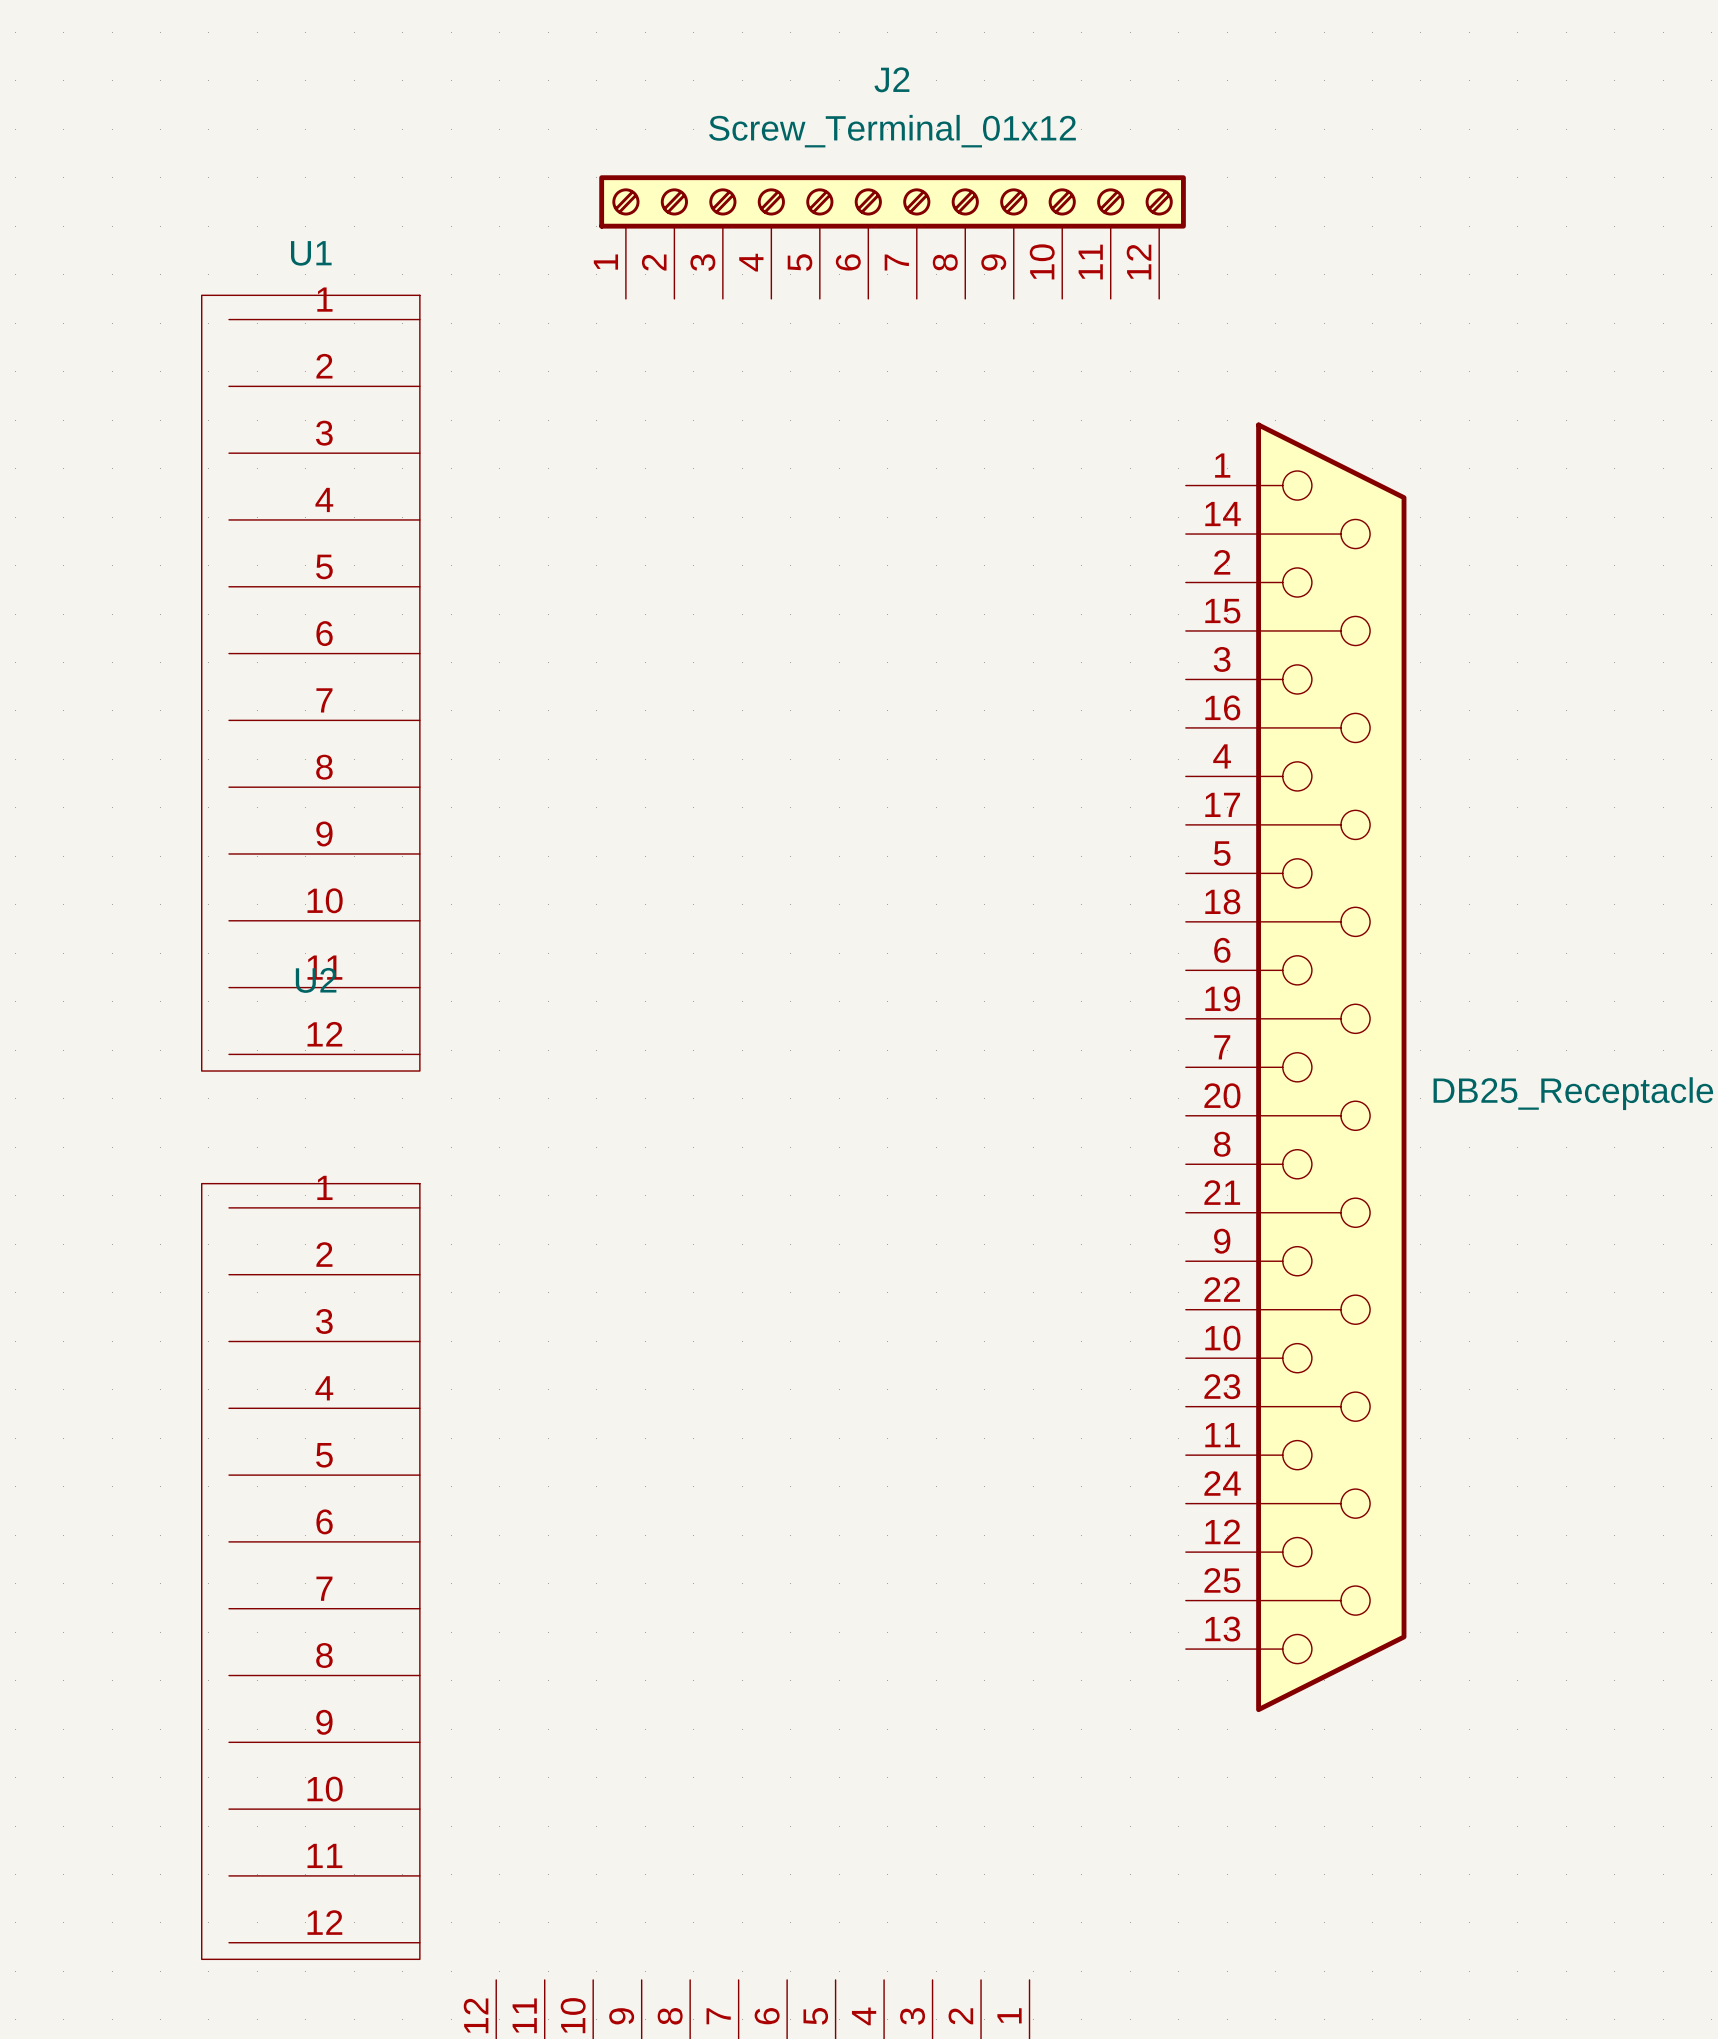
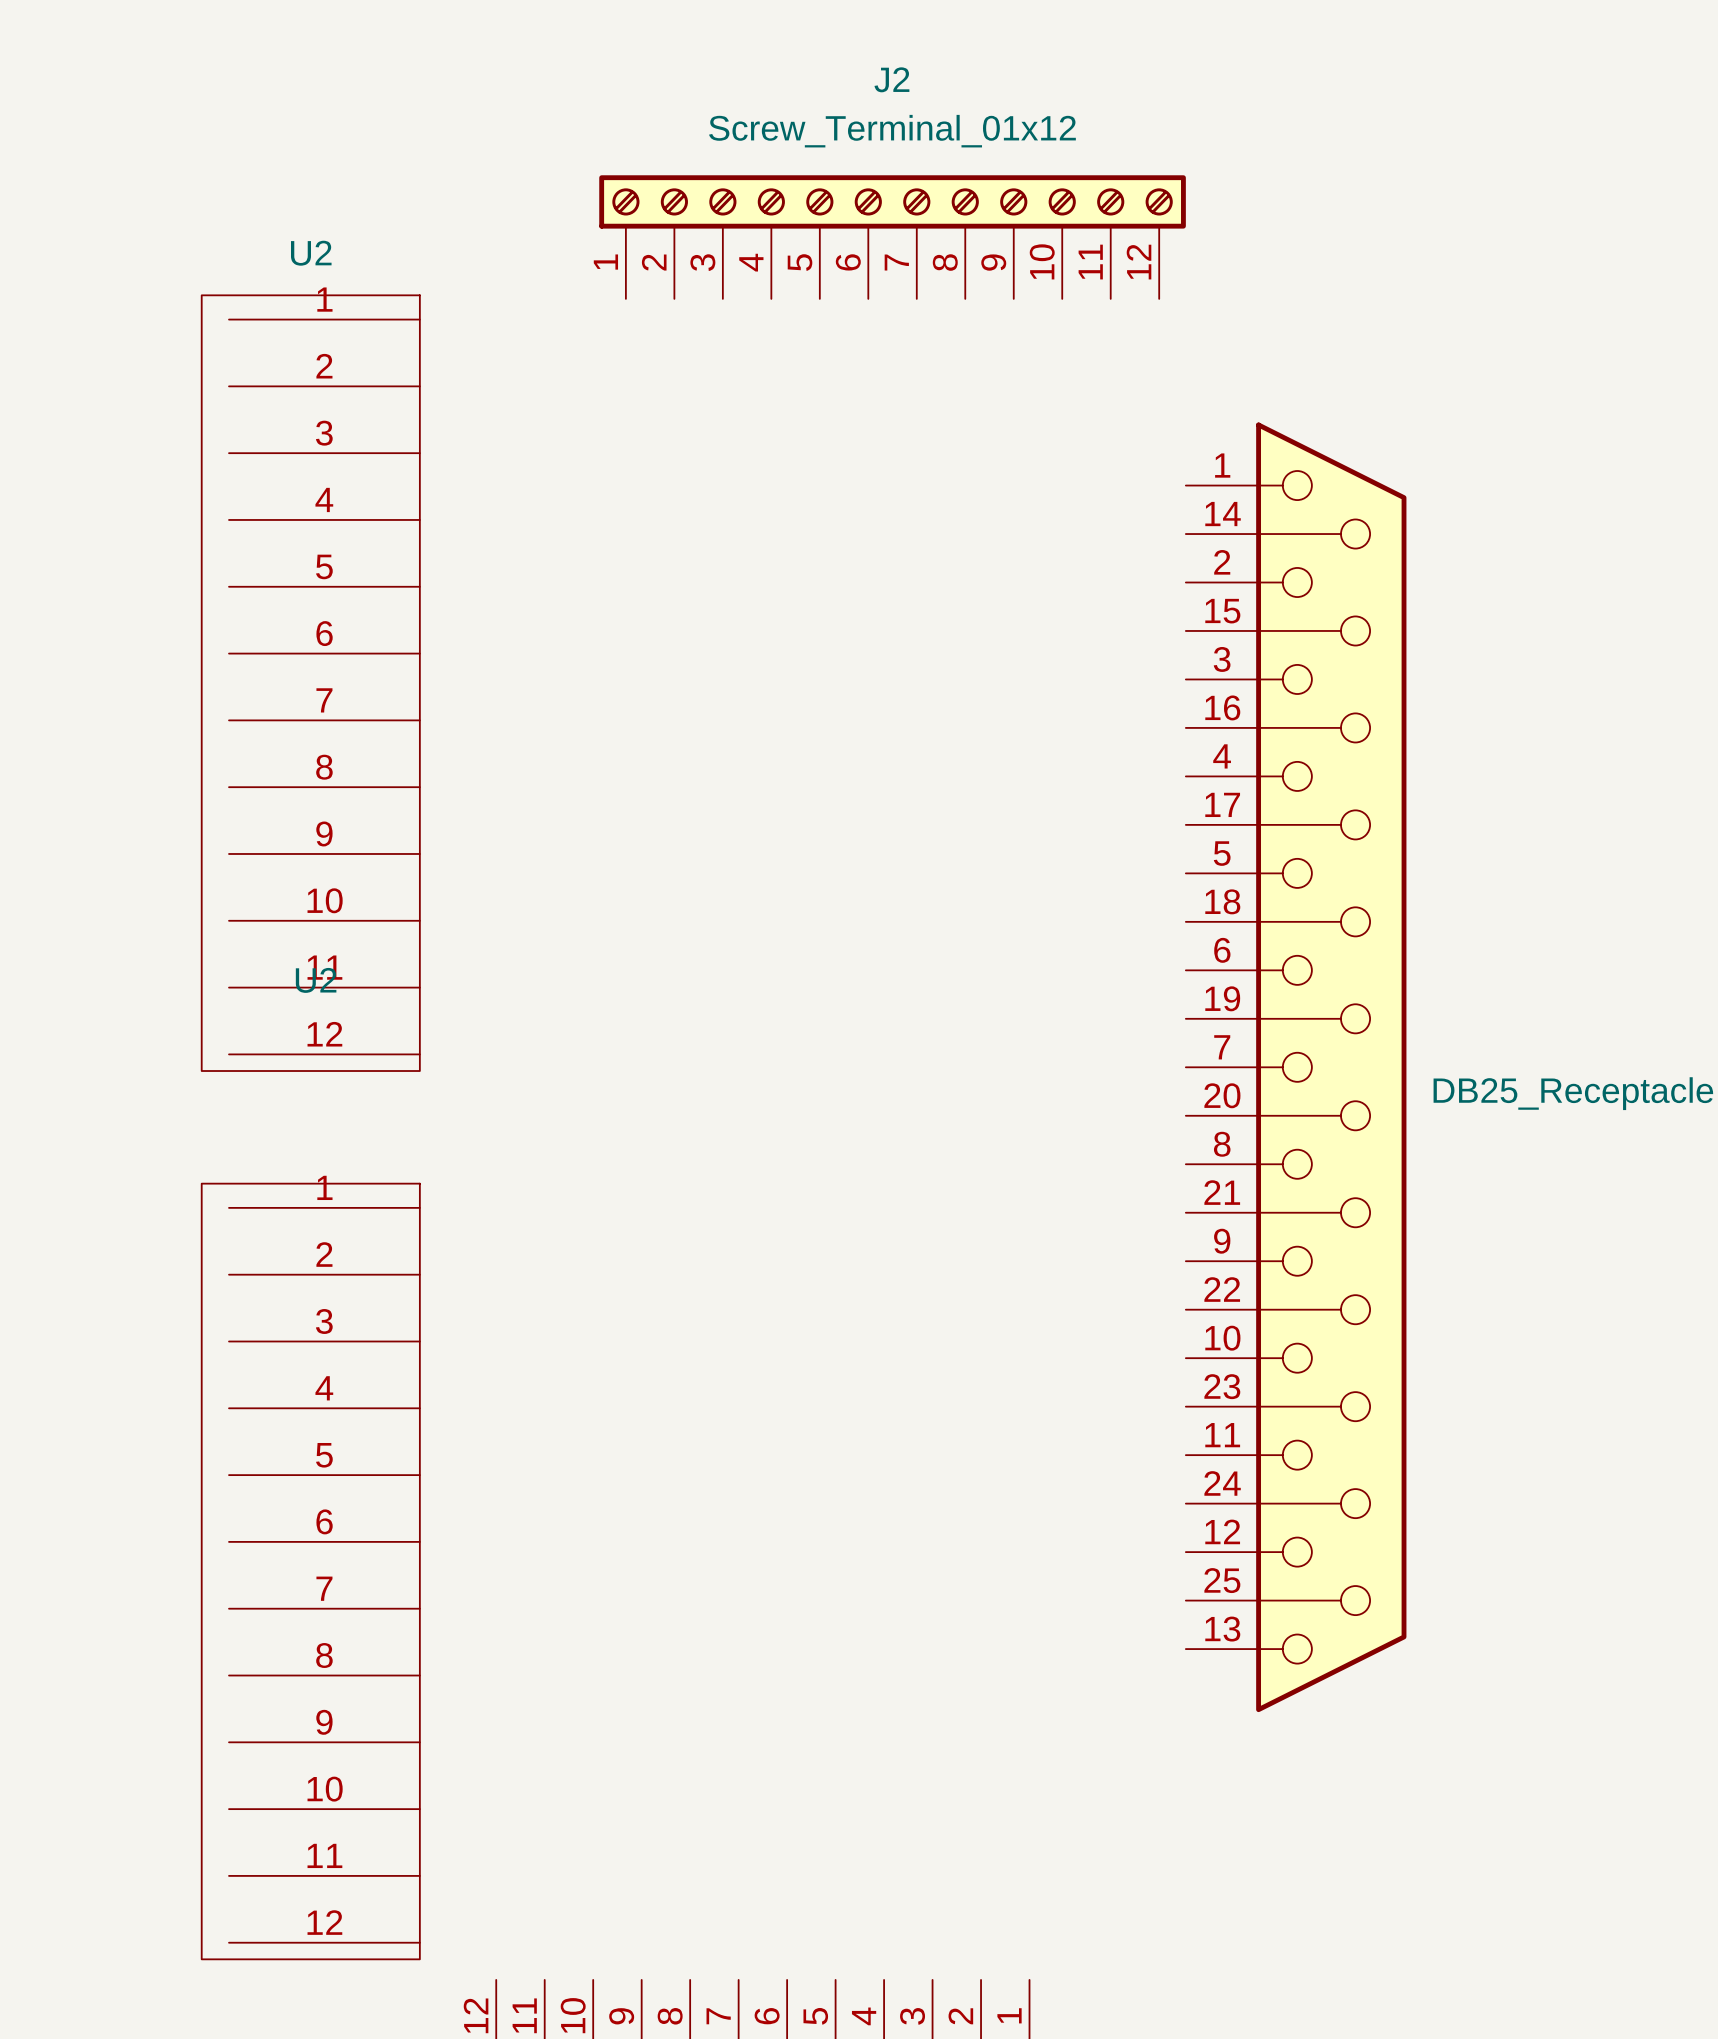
U1 name: U1 (311, 253) -> U2 (311, 253)

